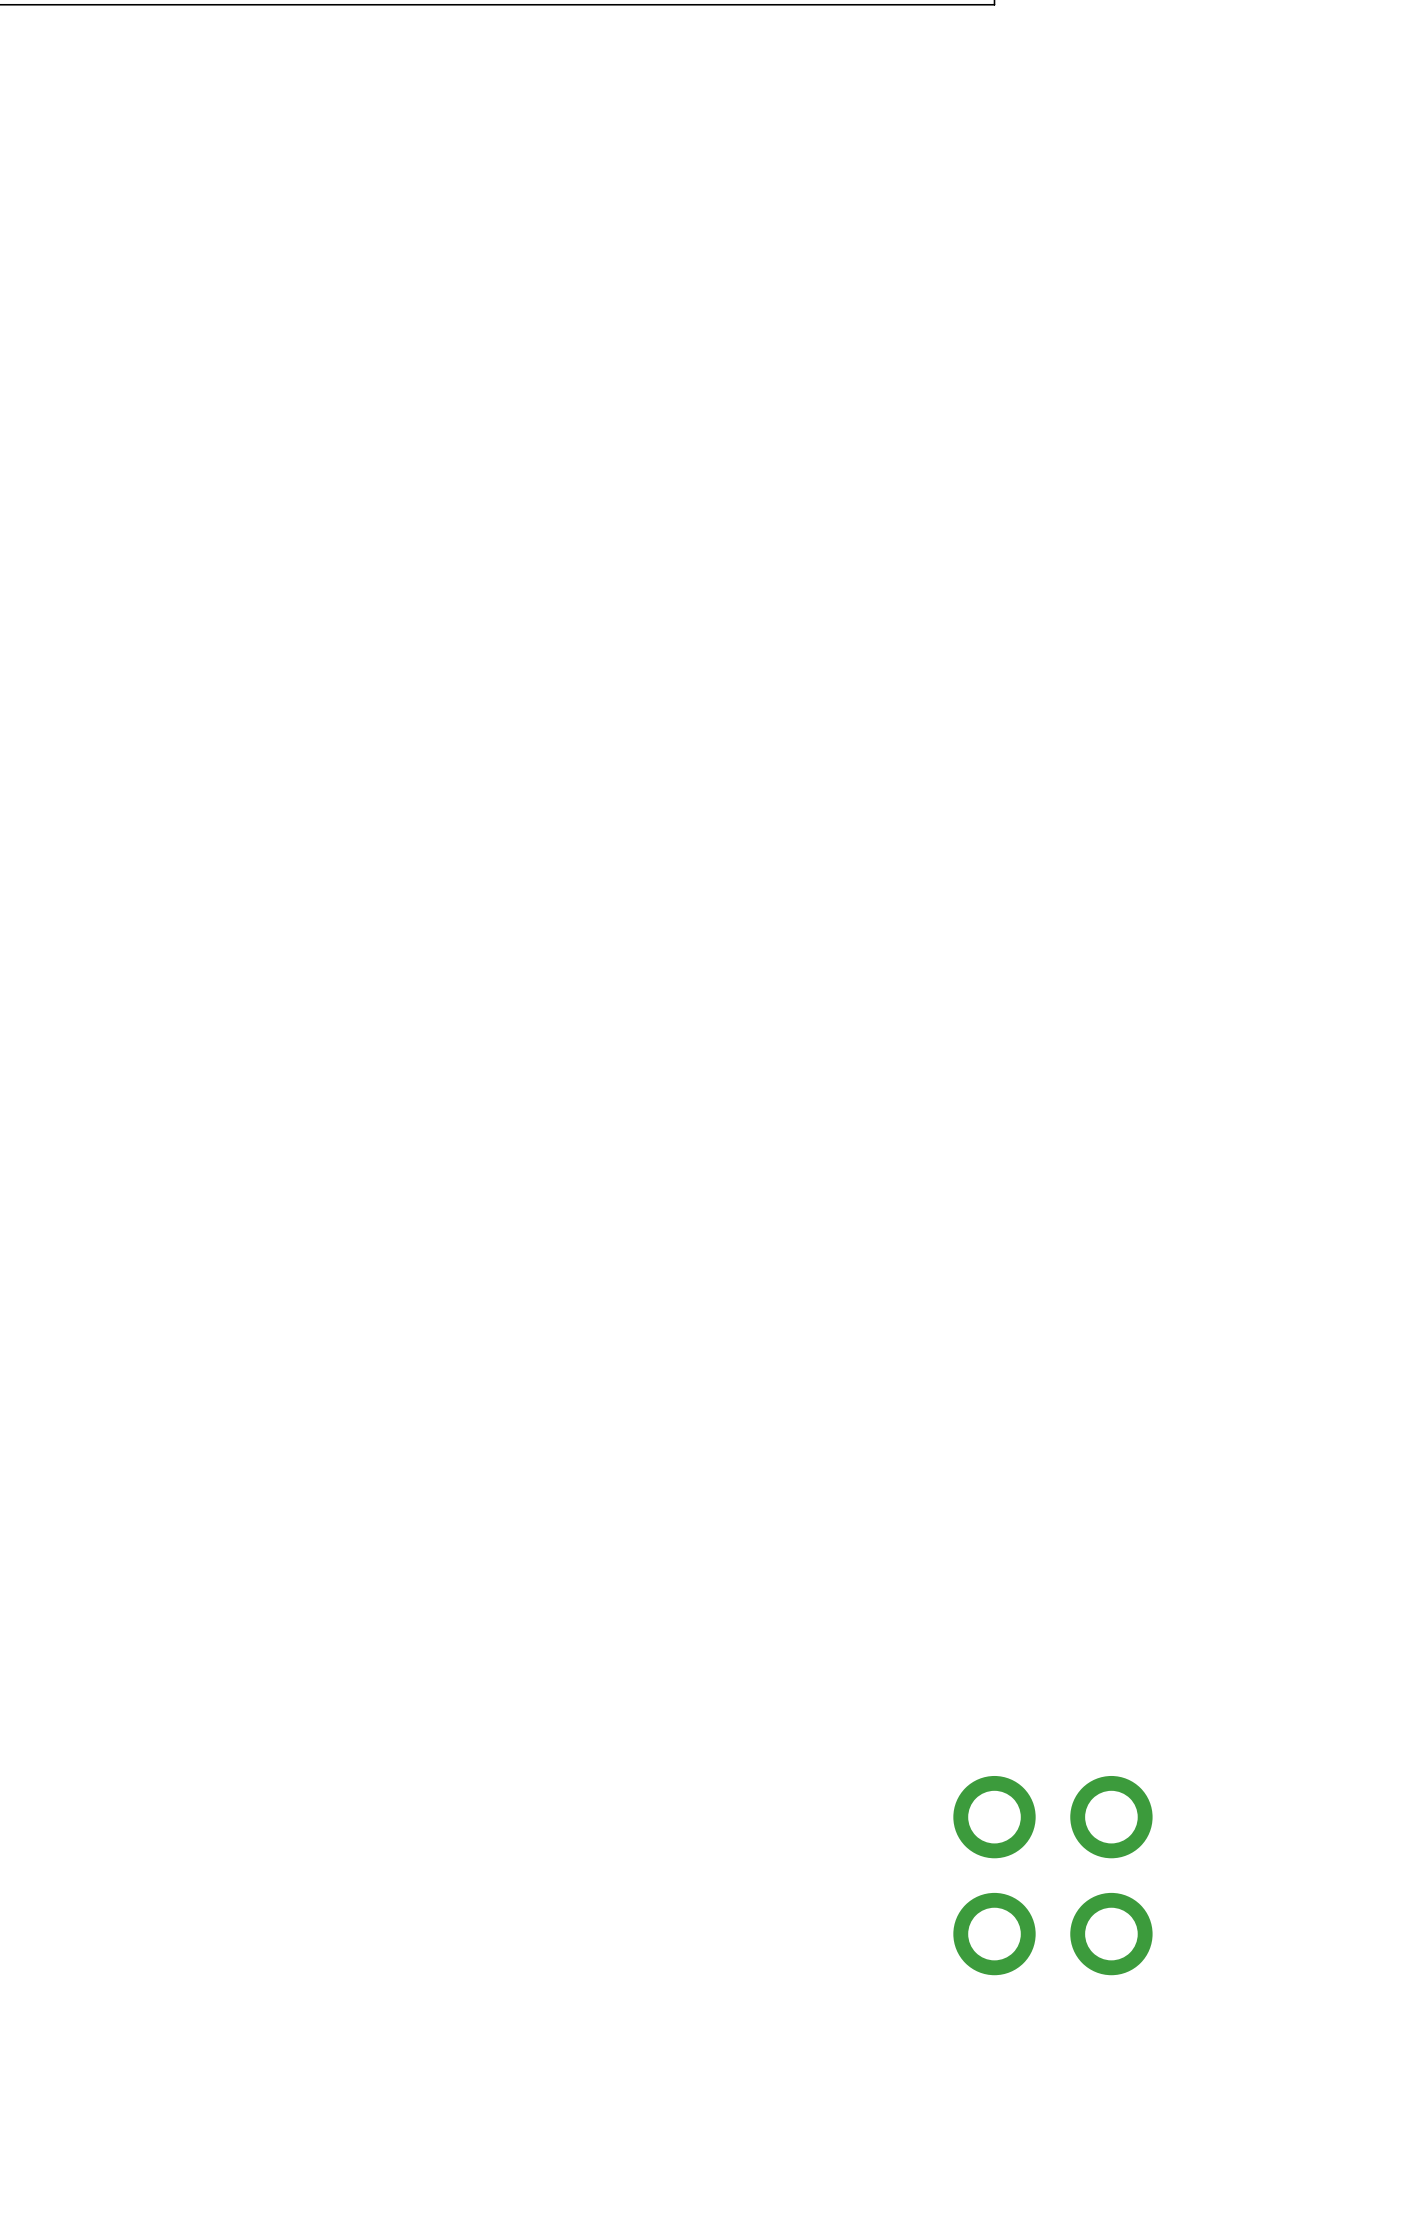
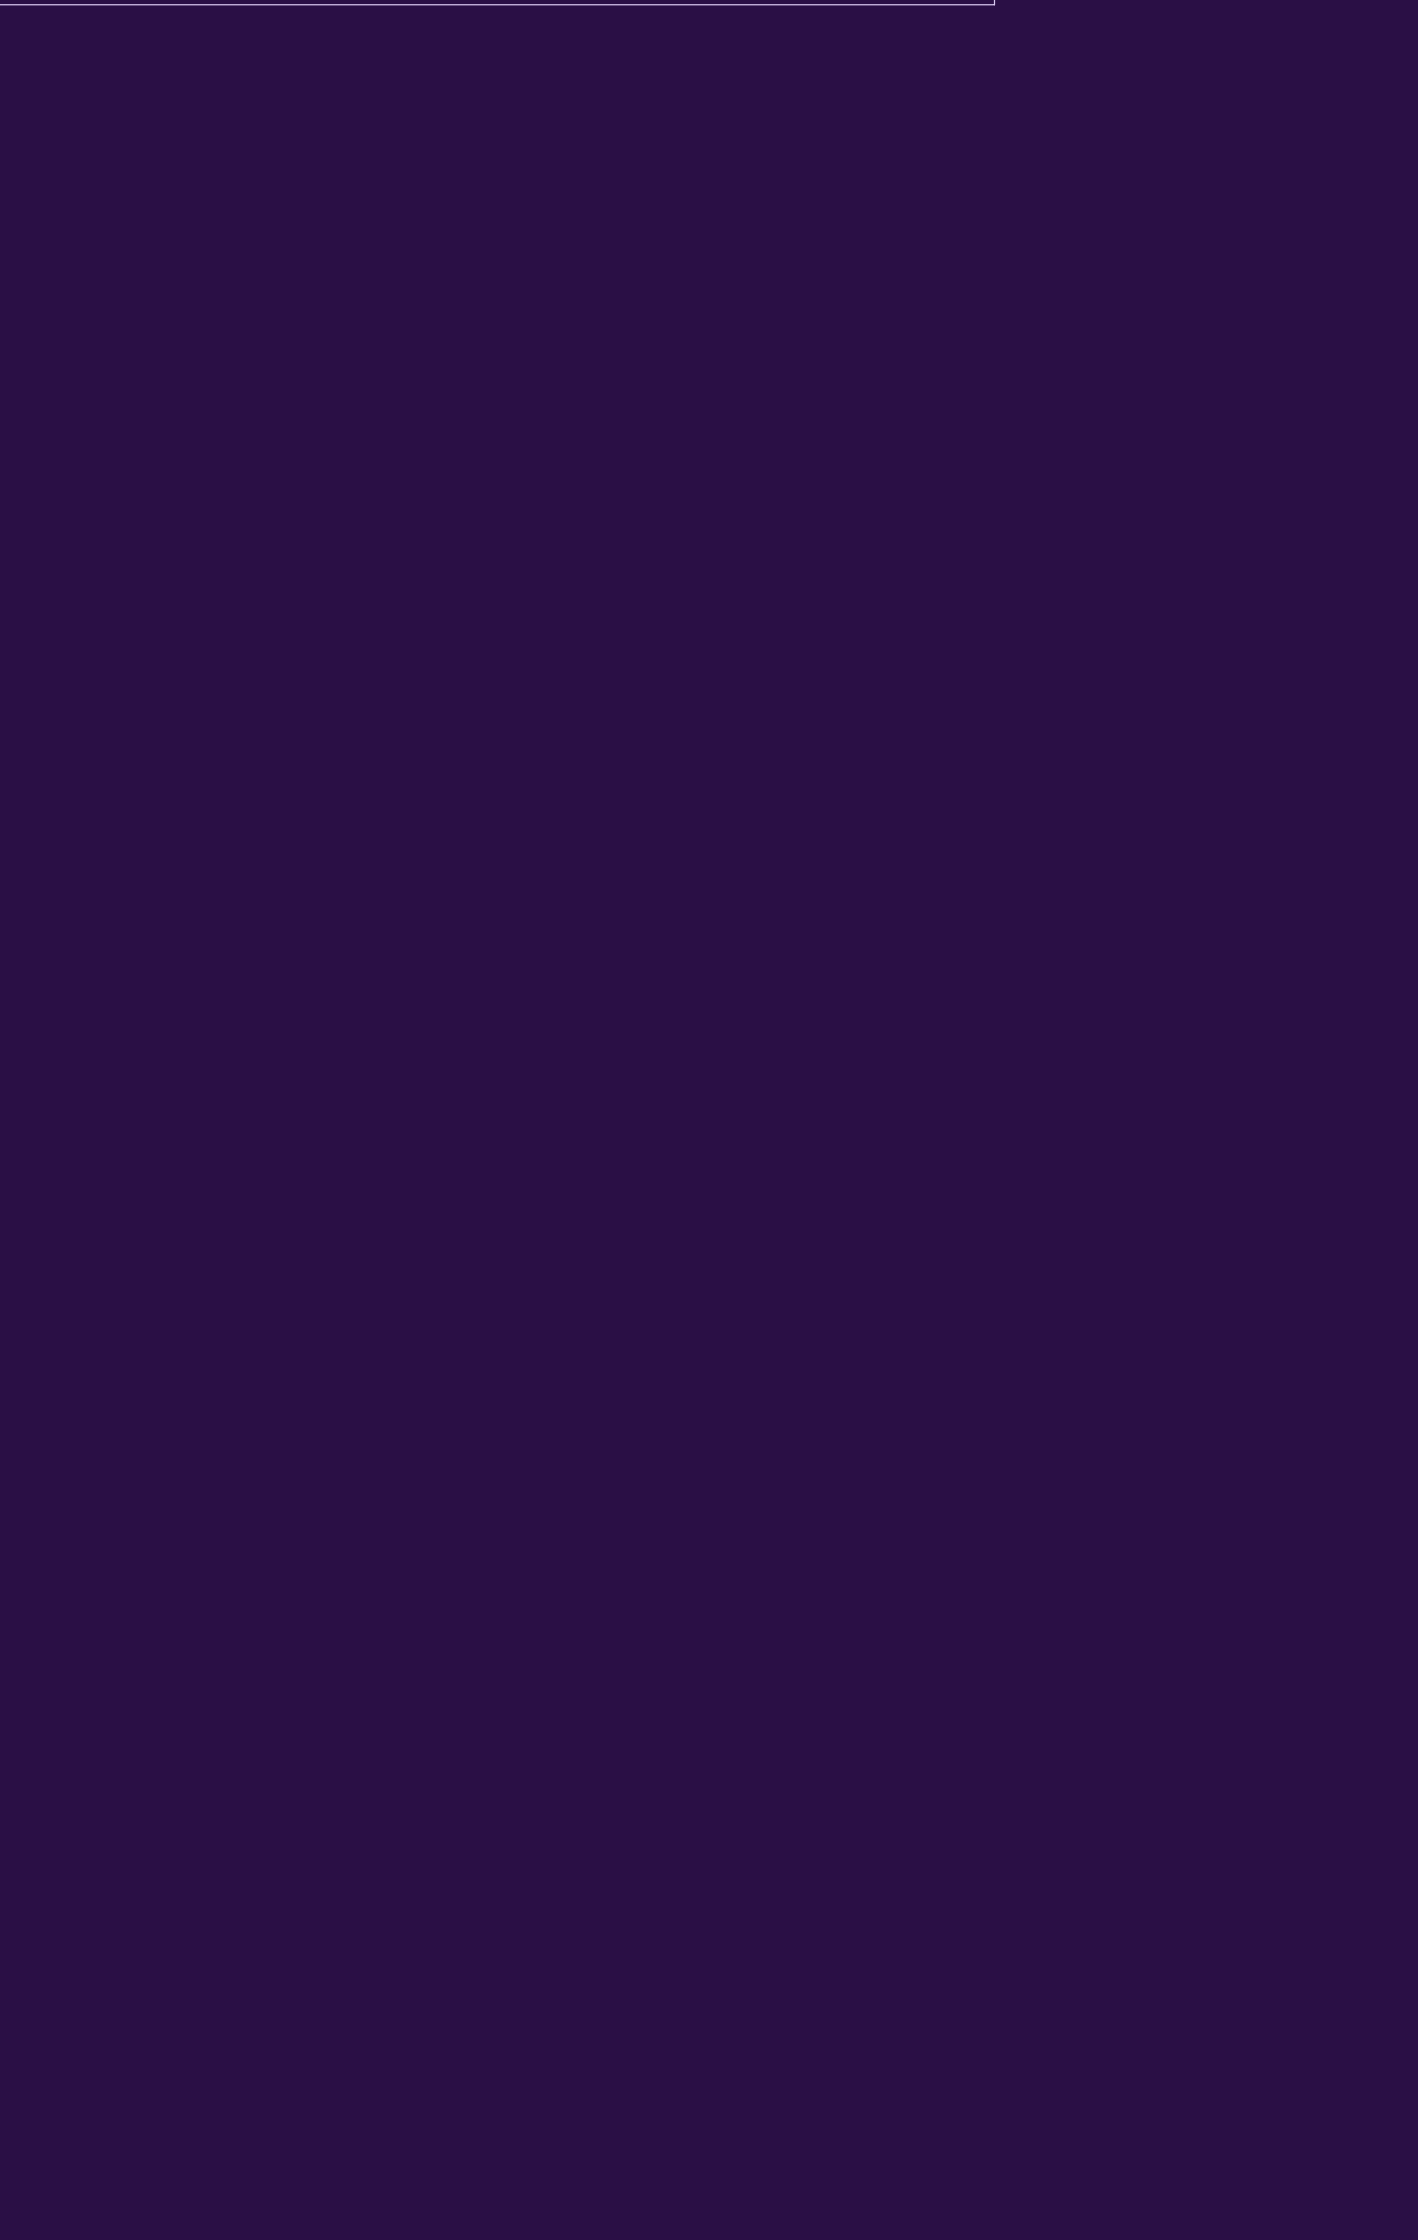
part: (1052, 1875) -> none

